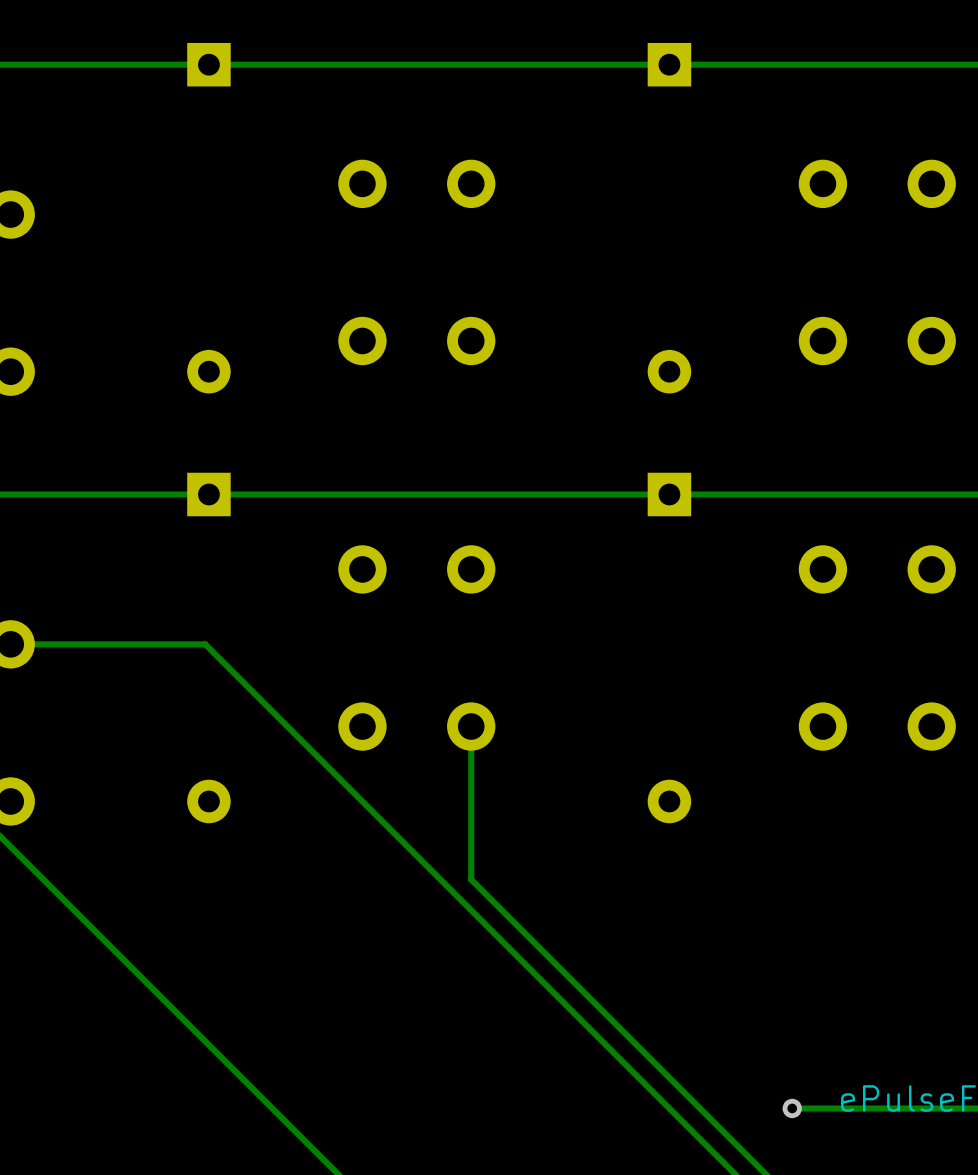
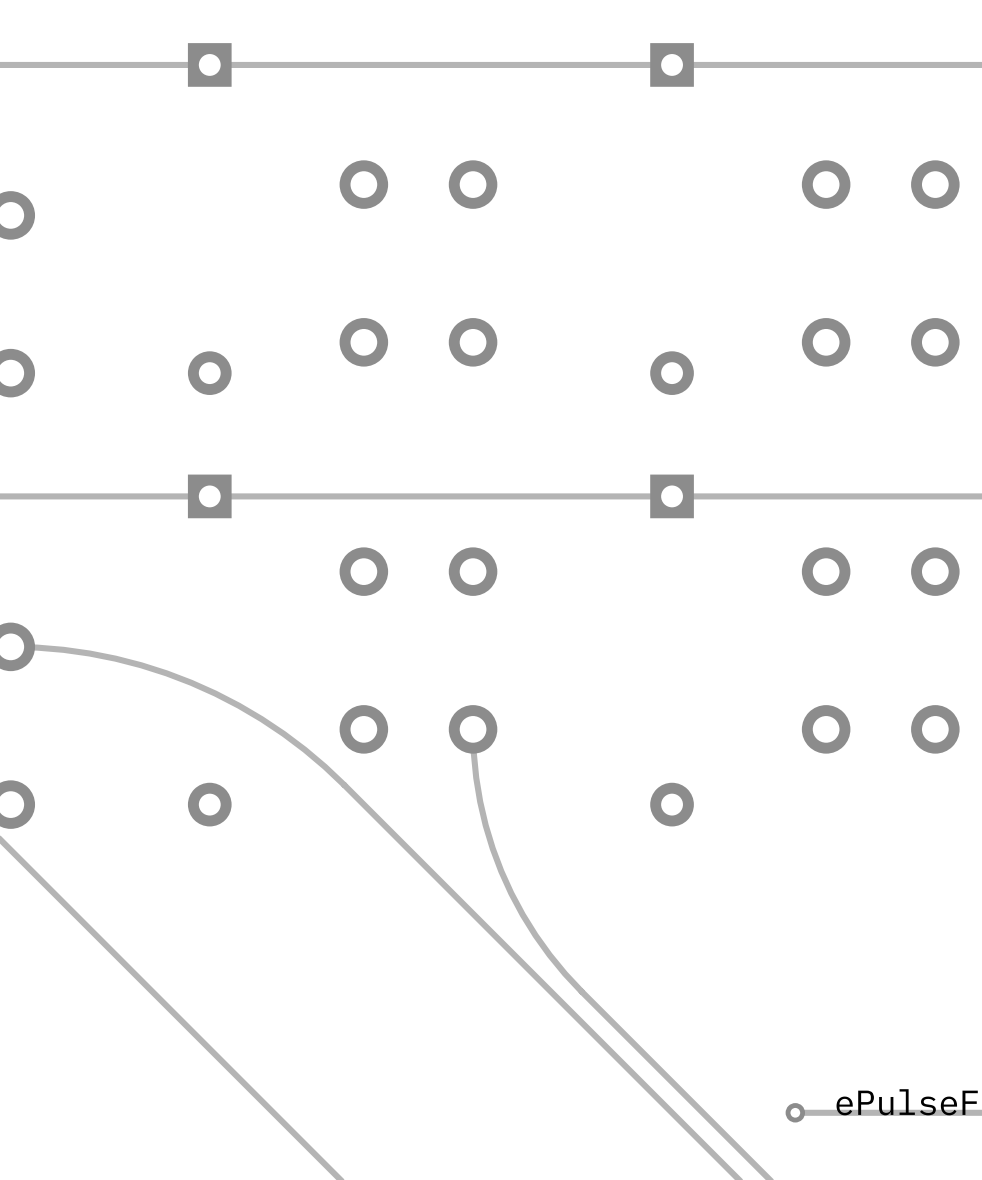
track: (10, 644) (205, 644) (342, 781) -> (10, 646) (89, 653) (141, 665) (191, 682) (261, 719) (304, 749) (344, 785)
track: (471, 726) (471, 879) (579, 987) -> (473, 729) (476, 777) (480, 801) (485, 825) (501, 871) (511, 893) (535, 935) (565, 973) (581, 991)

